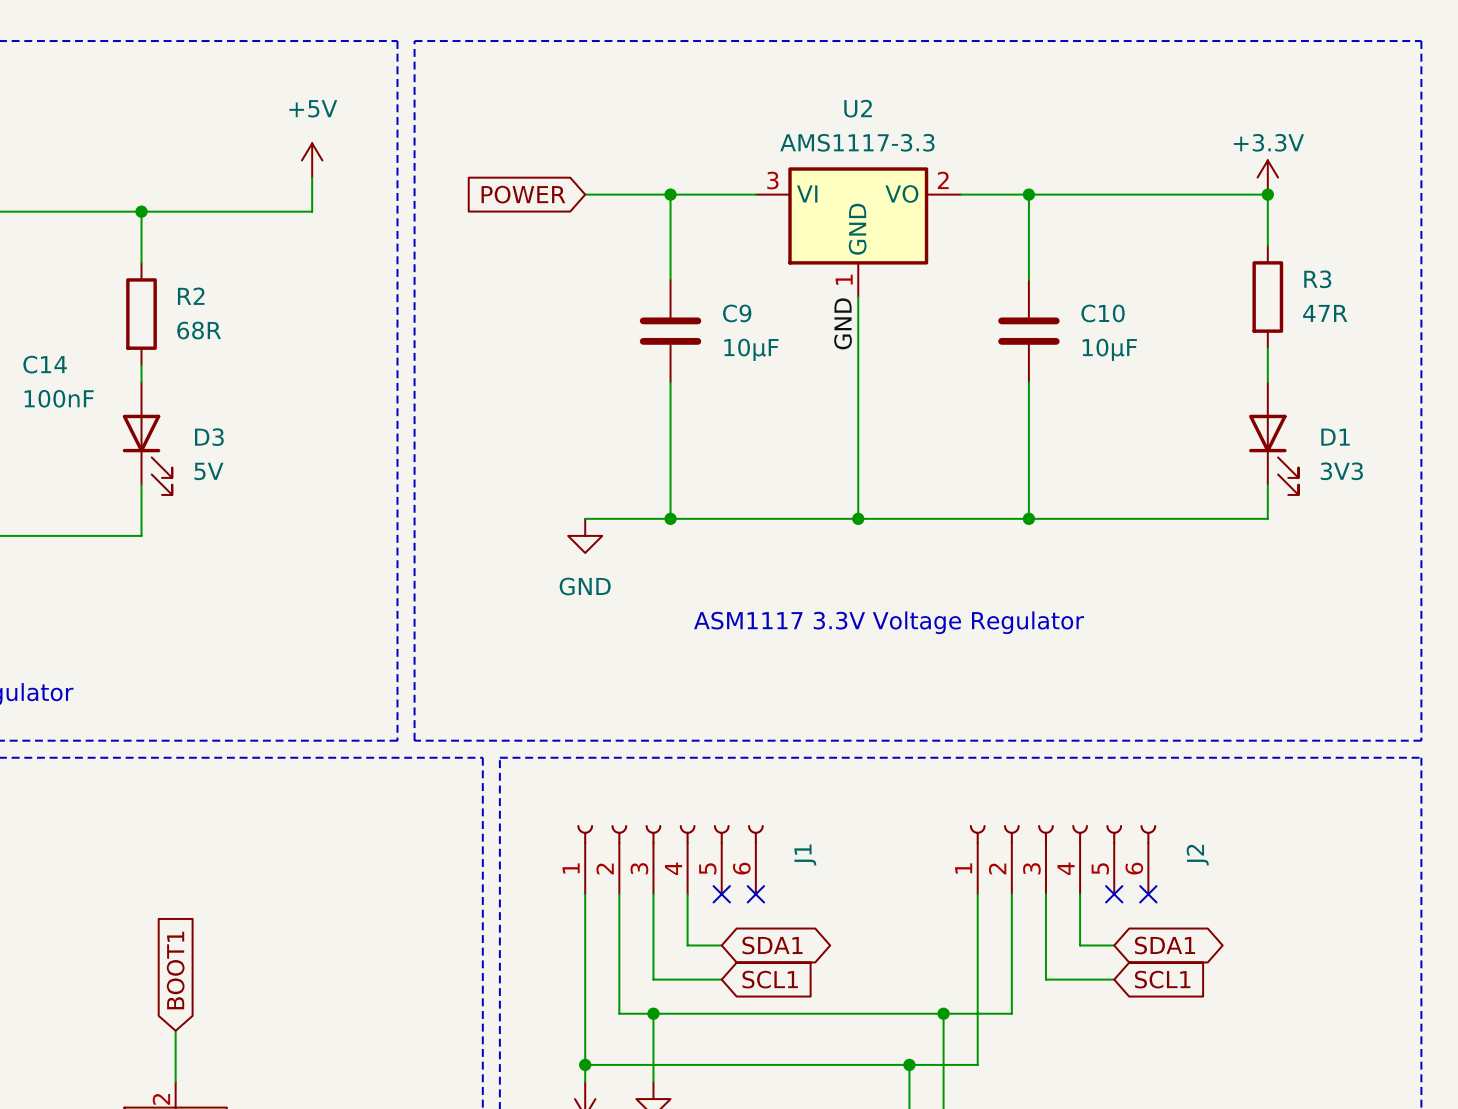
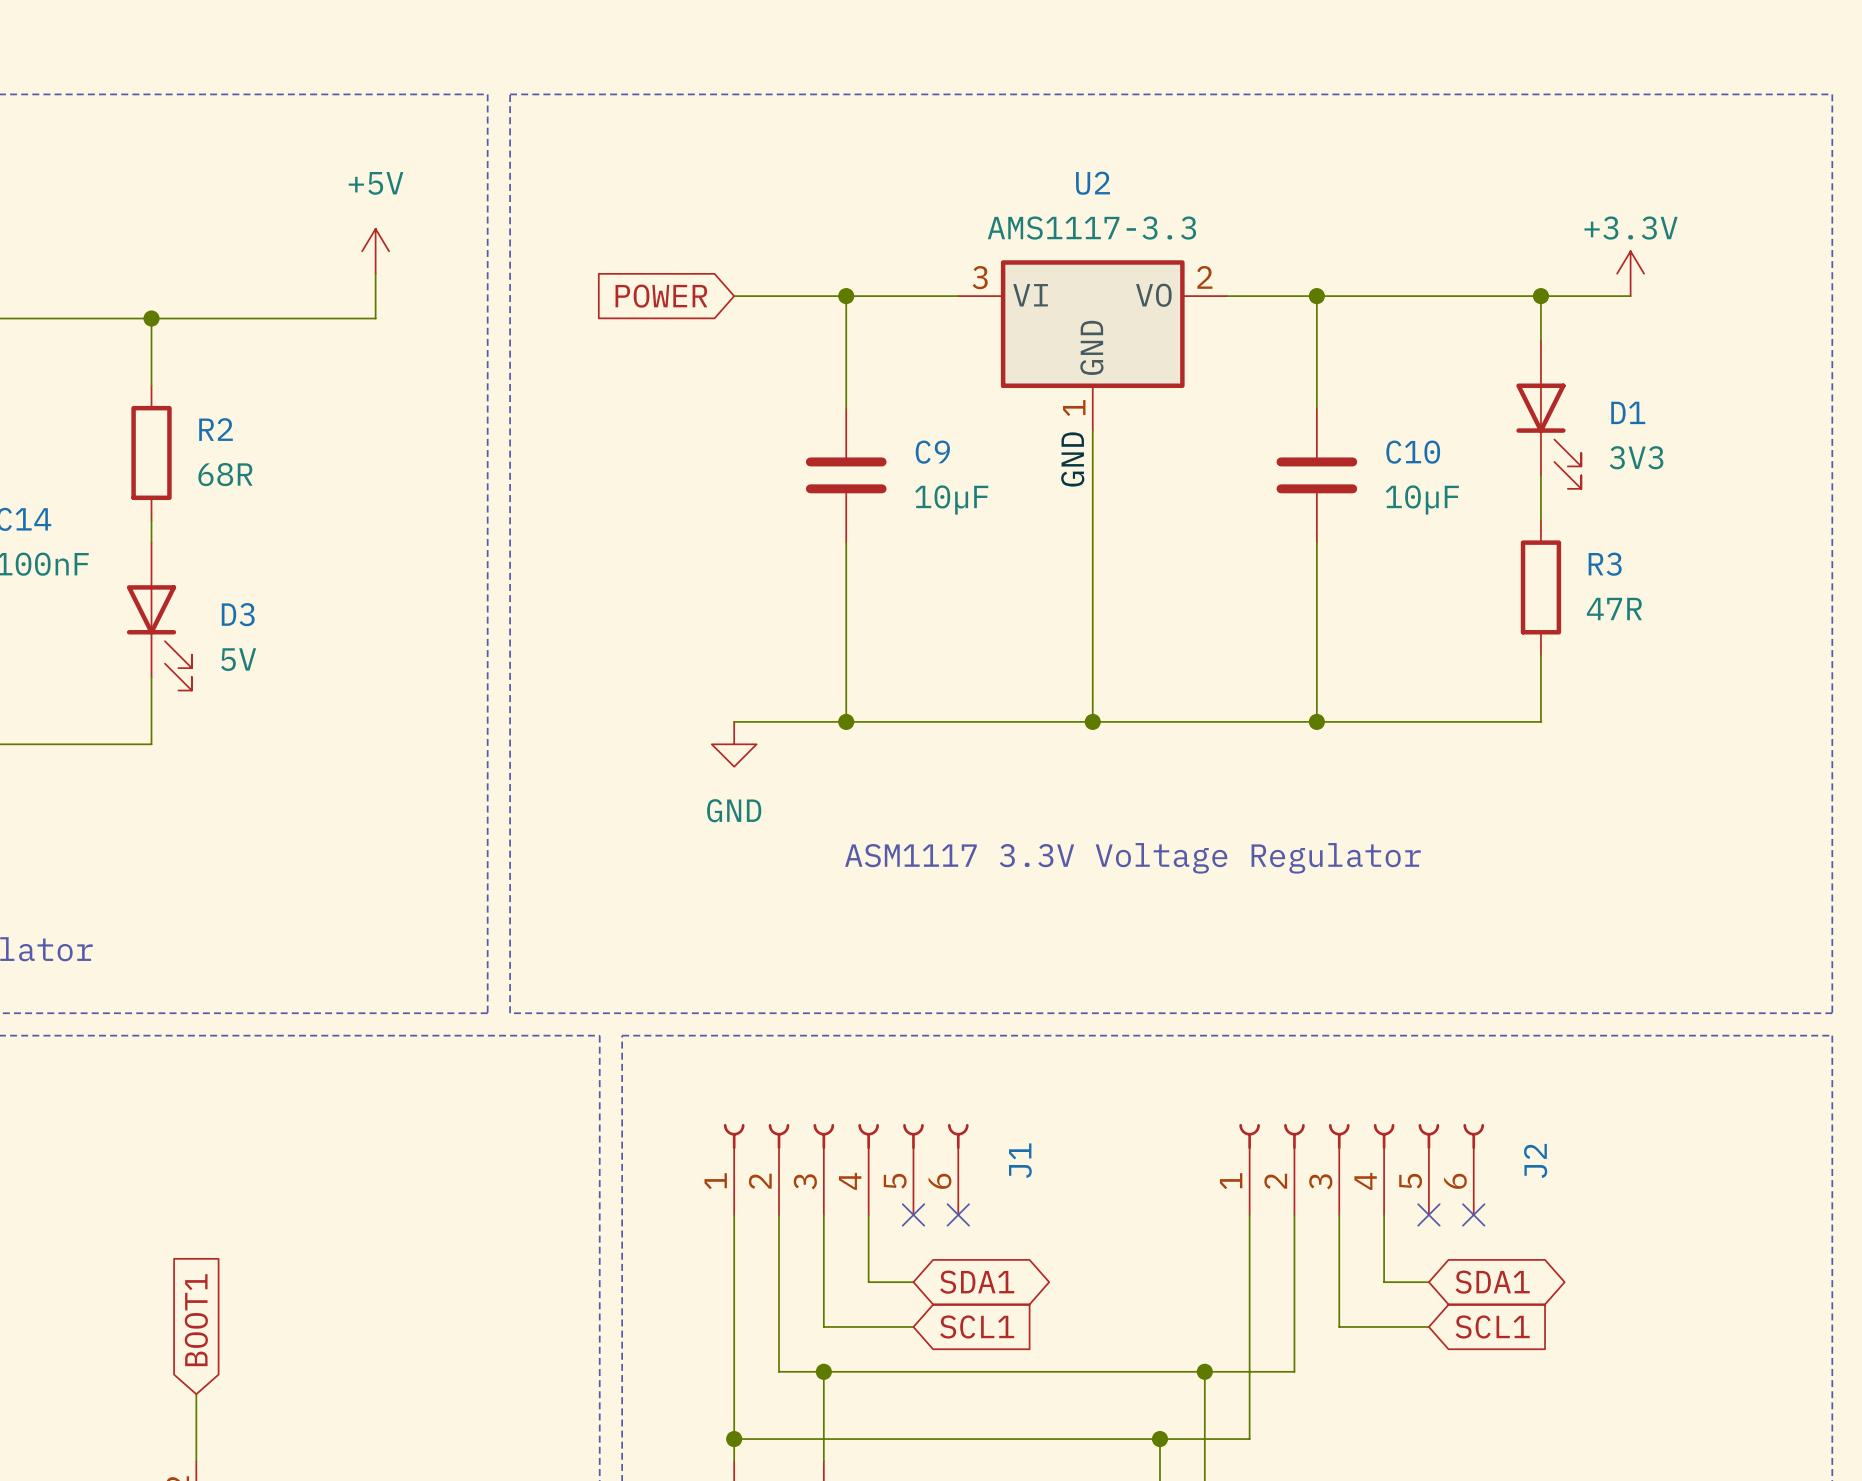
wire: none -> (1540, 296) (1540, 340)
wire: (1267, 194) (1267, 245) -> none
junction position: (1267, 194) -> (1540, 296)
R3 position: (1267, 297) -> (1540, 587)
wire: (1267, 348) (1267, 382) -> (1540, 475) (1540, 520)
D1 position: (1273, 438) -> (1548, 414)
wire: (1267, 484) (1267, 518) (1199, 518) -> (1540, 654) (1540, 721)

